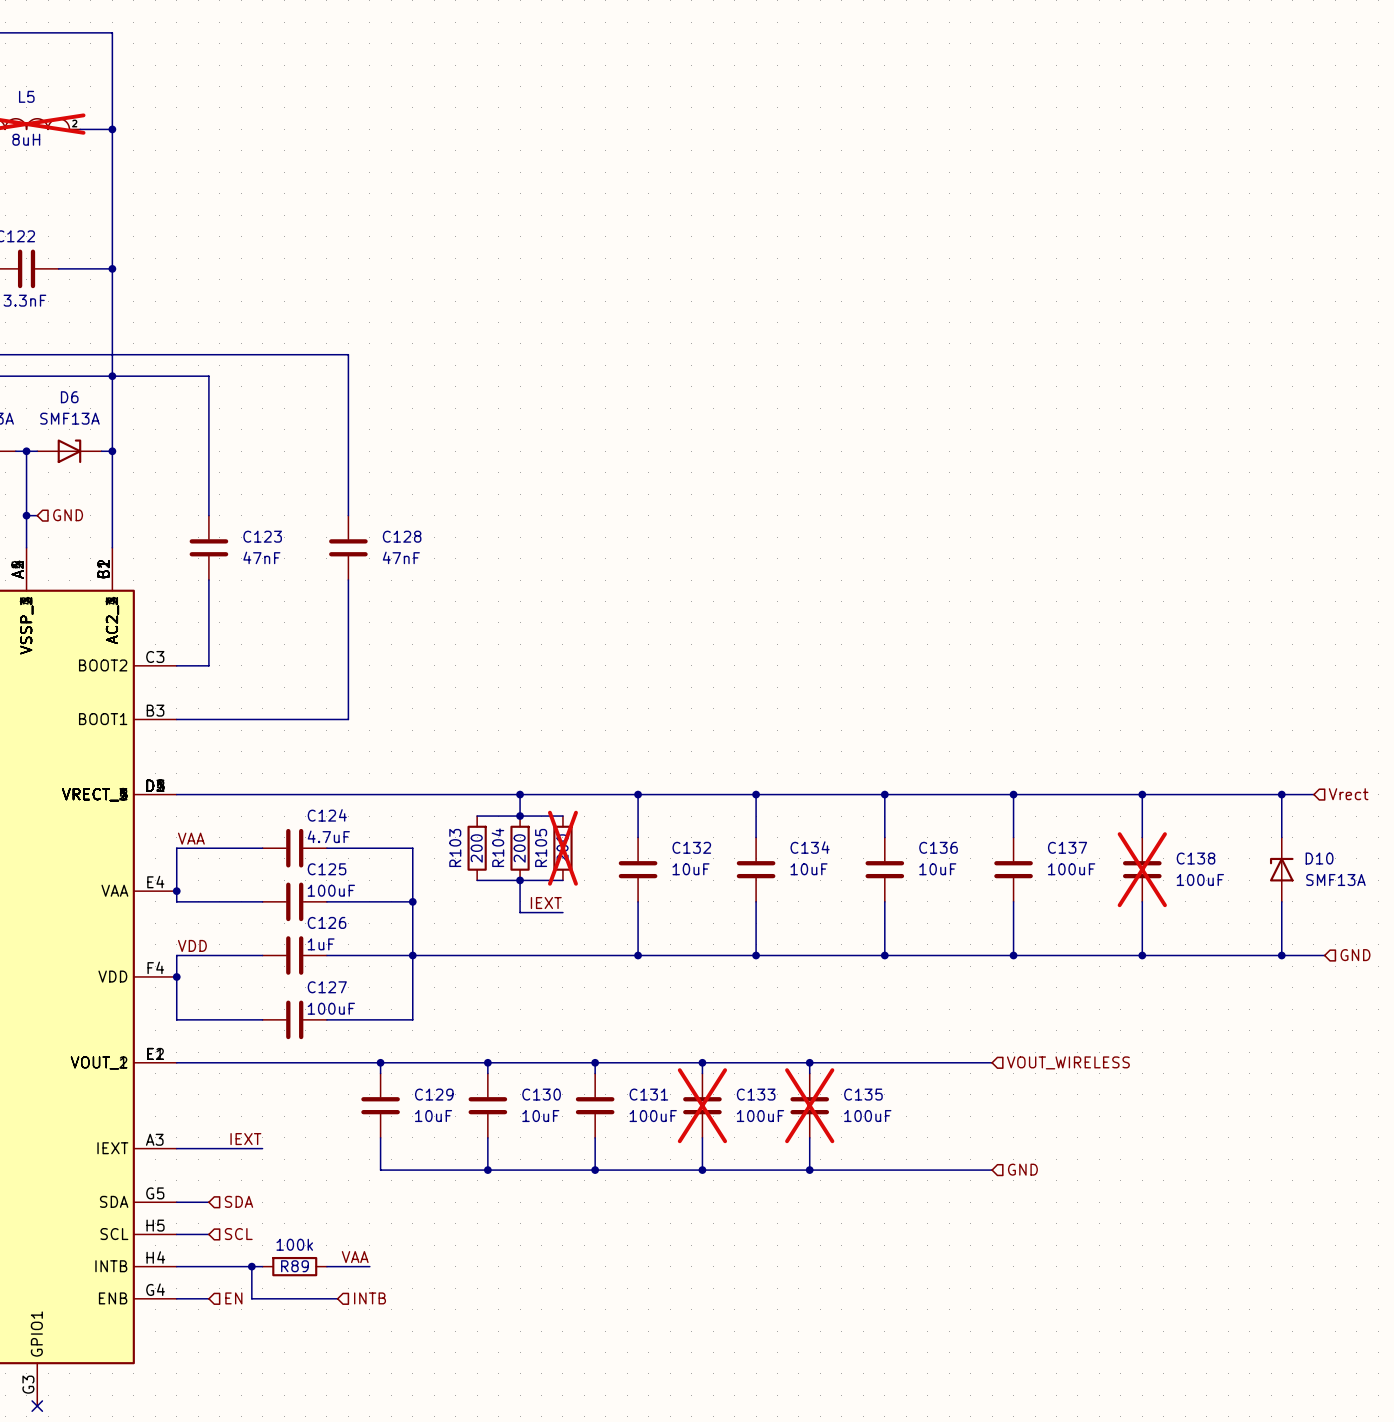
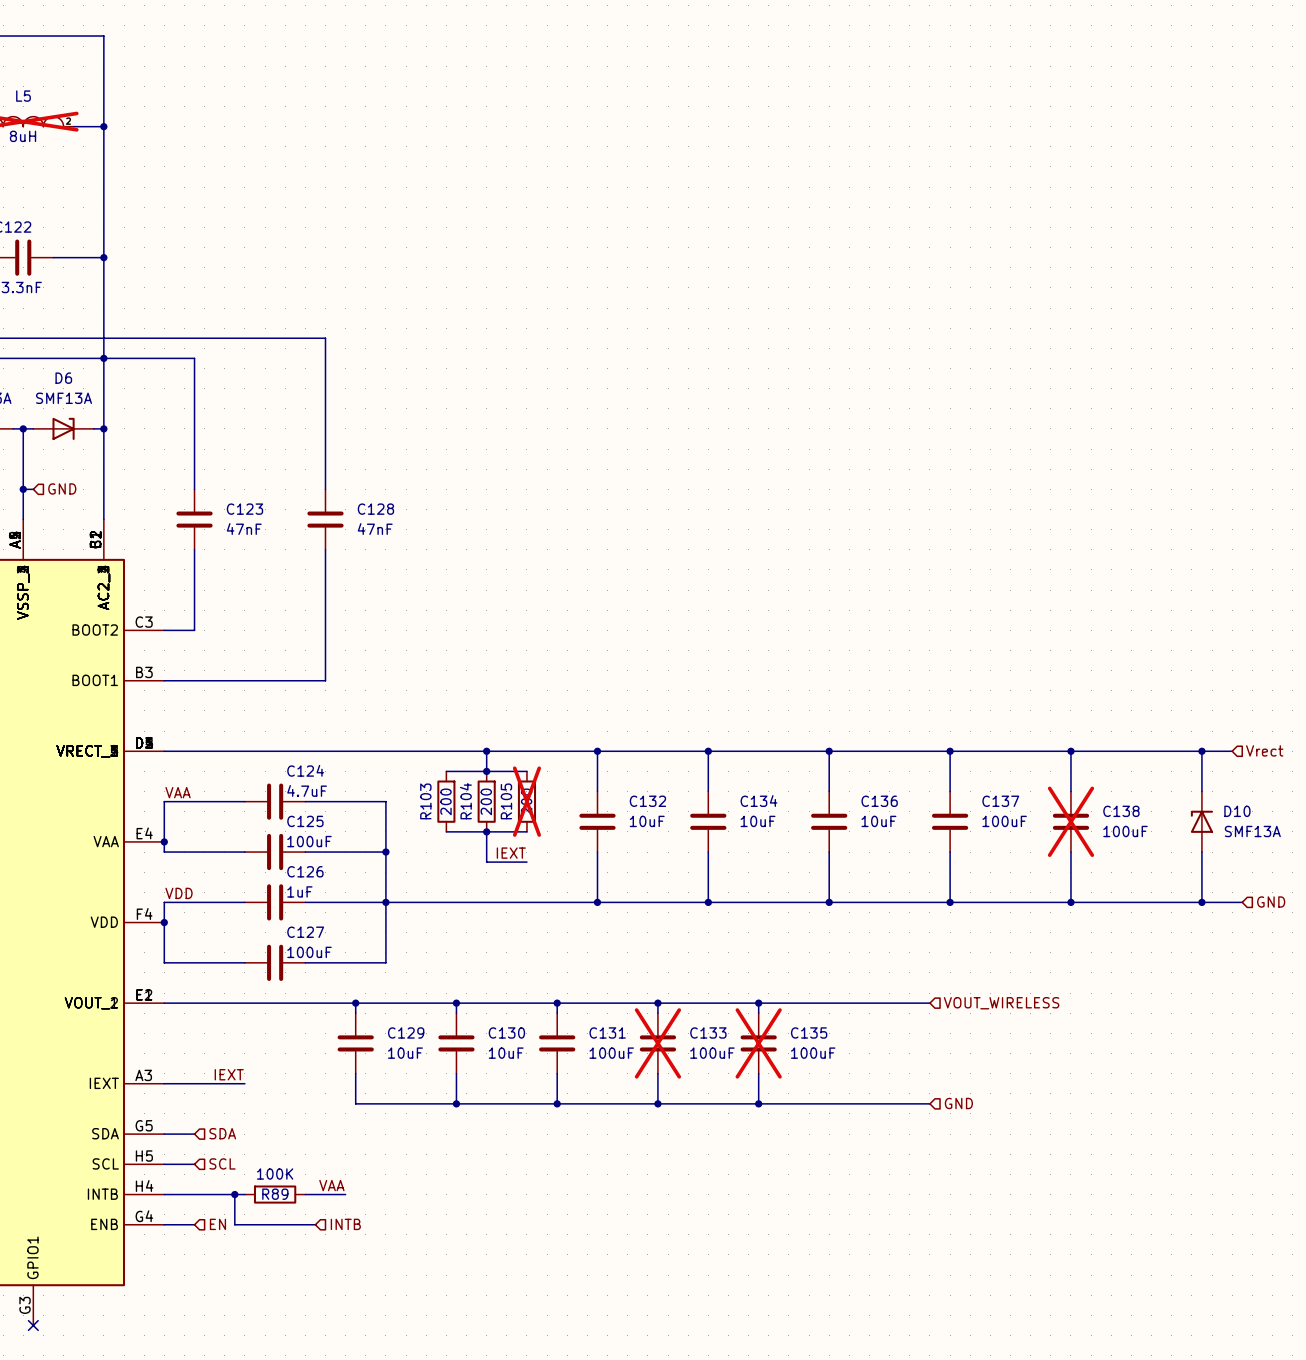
R89 value: 100k (294, 1244) -> 100K (275, 1174)

